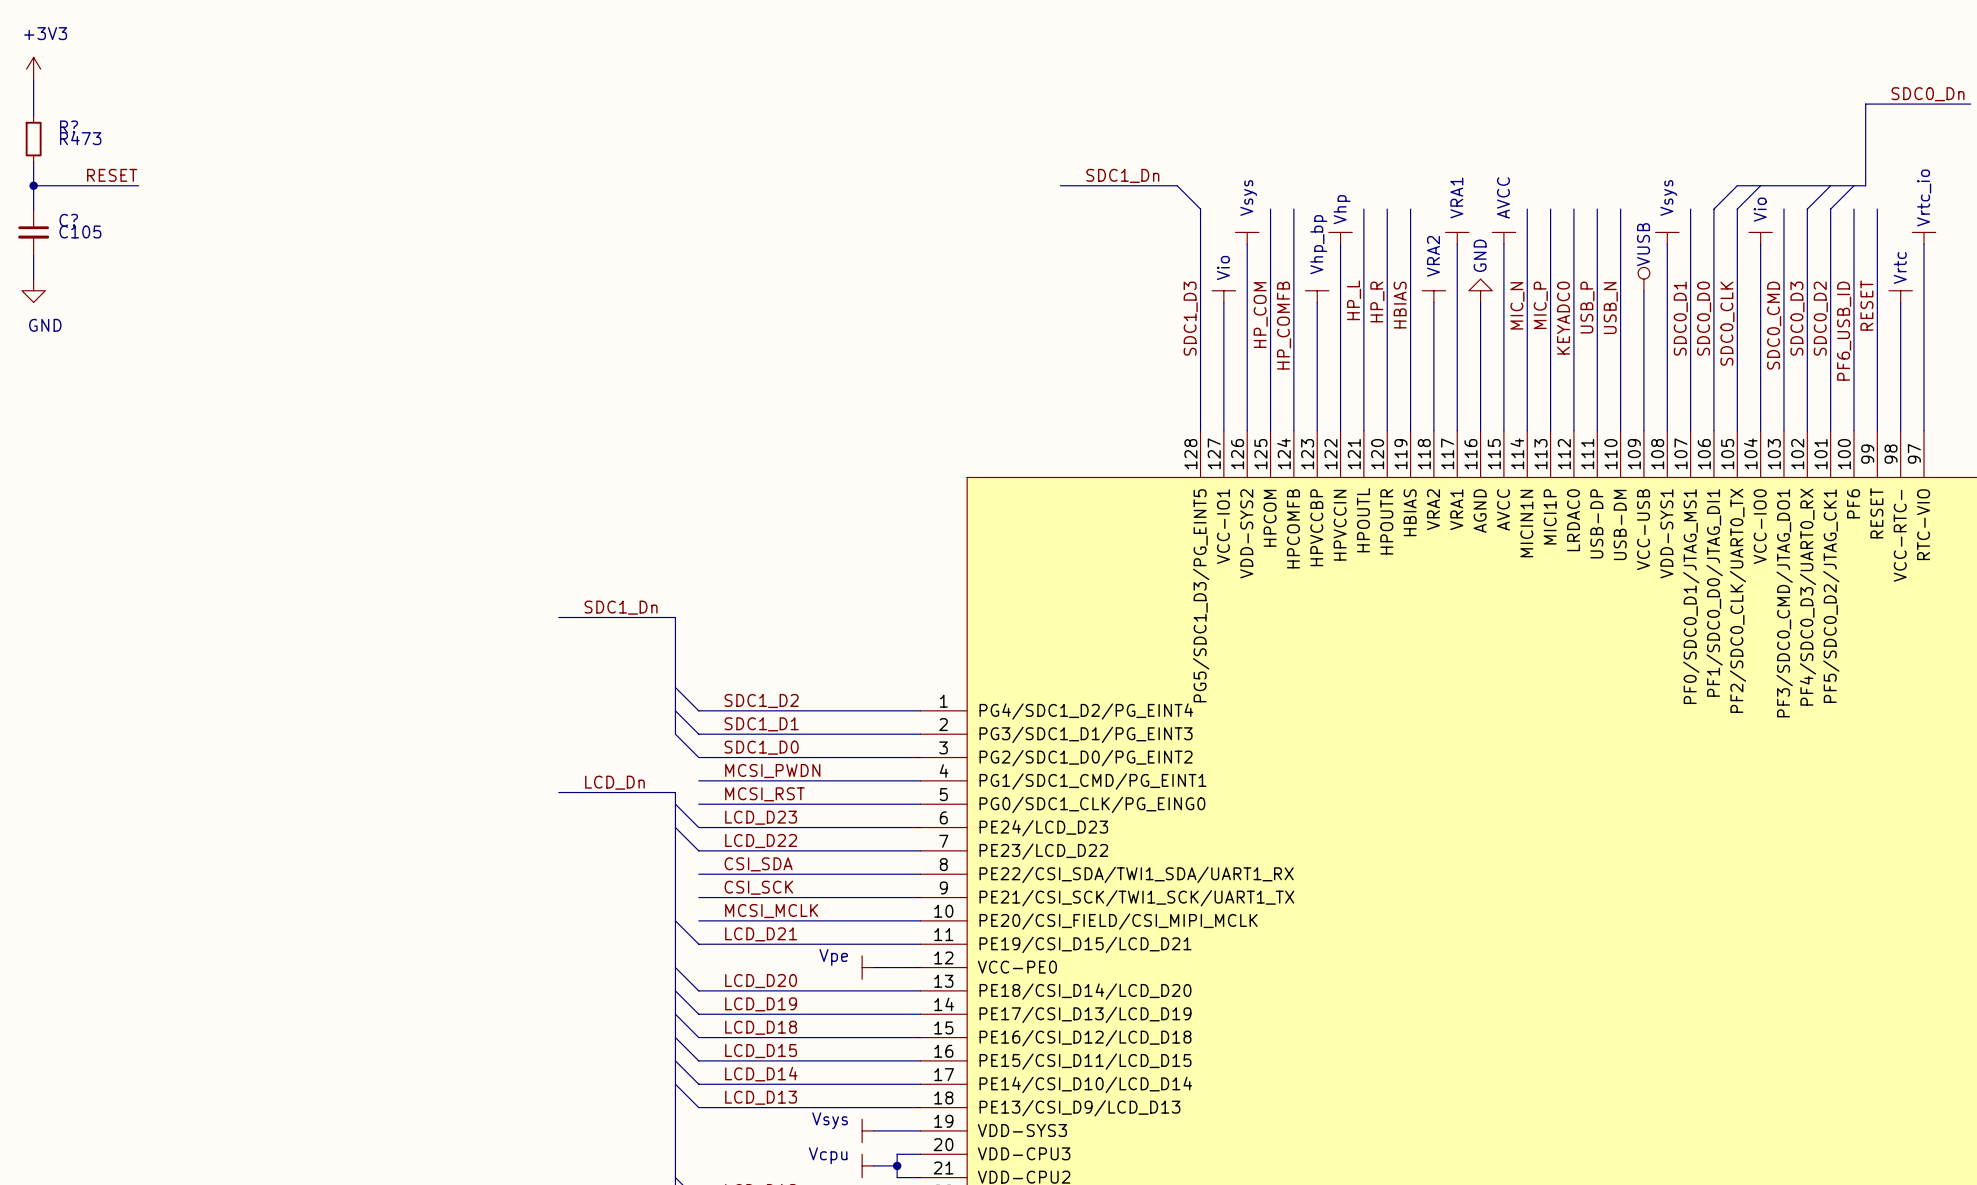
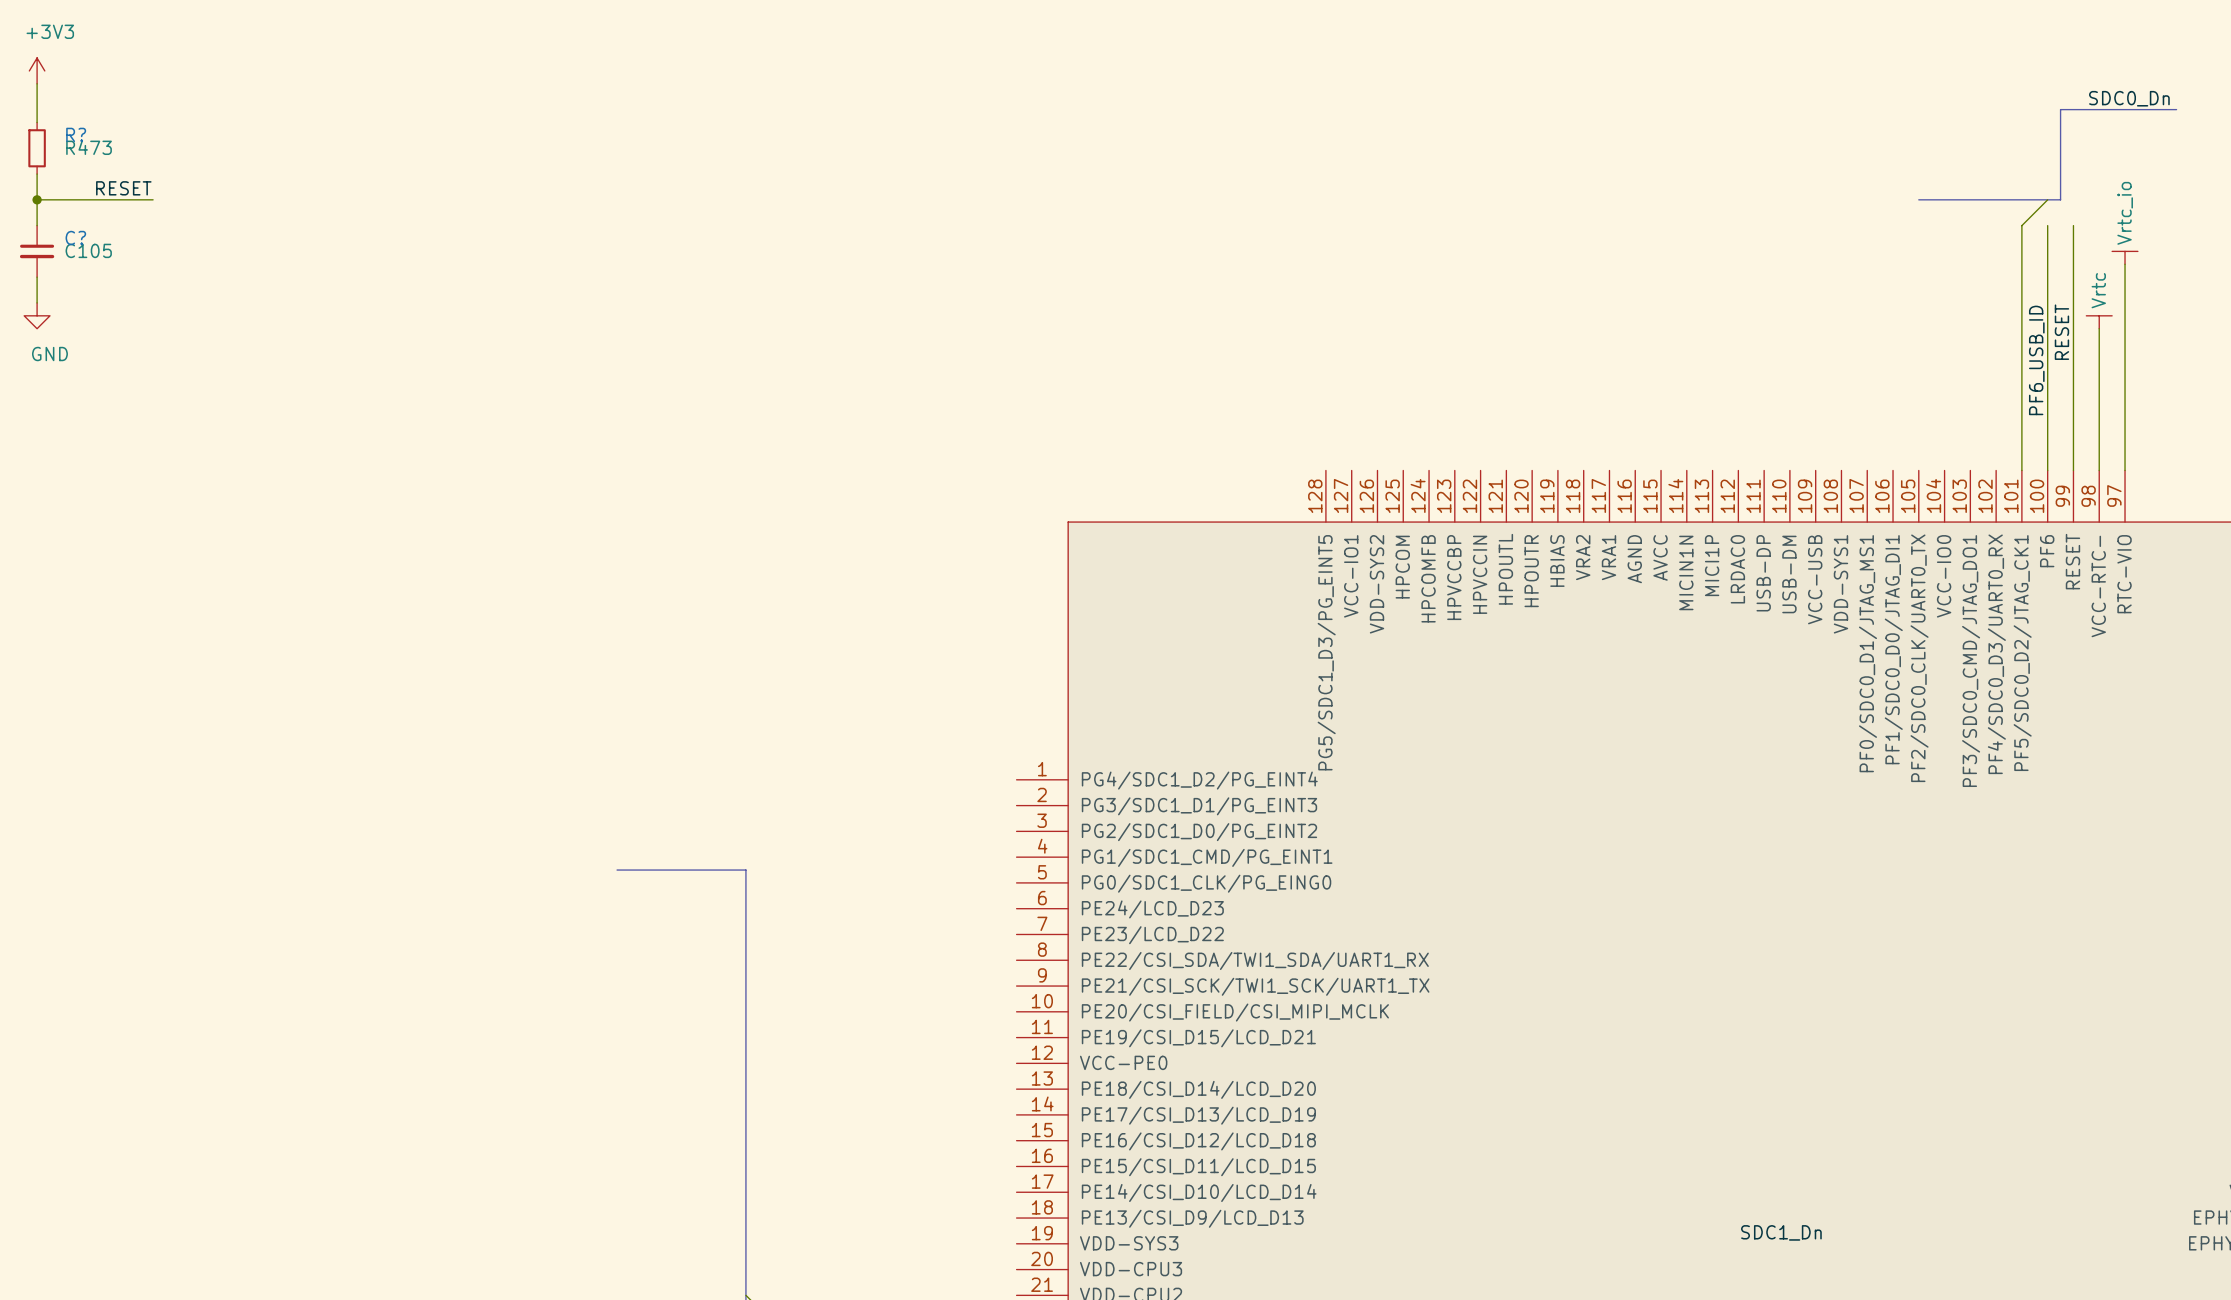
label: SDC1_Dn (1122, 175) -> none
bus: (1060, 185) (1177, 185) -> none
wire: (1177, 185) (1200, 209) (1200, 430) -> none
wire: (1737, 185) (1713, 209) (1713, 430) -> none
wire: (1760, 185) (1737, 209) (1737, 430) -> none
wire: (1830, 185) (1807, 209) (1807, 430) -> none
wire: (1270, 209) (1270, 430) -> none
wire: (1293, 209) (1293, 430) -> none
wire: (1363, 209) (1363, 430) -> none
wire: (1387, 209) (1387, 430) -> none
wire: (1410, 209) (1410, 430) -> none
wire: (1527, 209) (1527, 430) -> none
wire: (1550, 209) (1550, 430) -> none
wire: (1573, 209) (1573, 430) -> none
wire: (1597, 209) (1597, 430) -> none
wire: (1620, 209) (1620, 430) -> none
wire: (1690, 209) (1690, 430) -> none
wire: (1783, 209) (1783, 430) -> none
power symbol: Vsys (1247, 238) -> none
power symbol: Vhp (1340, 238) -> none
power symbol: VRA1 (1457, 238) -> none
power symbol: AVCC (1503, 238) -> none
power symbol: Vsys (1667, 238) -> none
power symbol: Vio (1760, 238) -> none
wire: (1247, 244) (1247, 430) -> none
wire: (1340, 244) (1340, 430) -> none
wire: (1457, 244) (1457, 430) -> none
wire: (1503, 244) (1503, 430) -> none
wire: (1667, 244) (1667, 430) -> none
wire: (1760, 244) (1760, 430) -> none
power symbol: VUSB (1643, 279) -> none
power symbol: GND (1480, 290) -> none
wire: (1643, 290) (1643, 430) -> none
power symbol: Vio (1223, 296) -> none
power symbol: Vhp_bp (1317, 296) -> none
power symbol: VRA2 (1433, 296) -> none
label: HP_L (1354, 300) -> none
label: HP_R (1377, 301) -> none
wire: (1223, 302) (1223, 430) -> none
wire: (1317, 302) (1317, 430) -> none
wire: (1433, 302) (1433, 430) -> none
wire: (1480, 302) (1480, 430) -> none
label: HBIAS (1400, 305) -> none
label: MIC_N (1517, 305) -> none
label: MIC_P (1540, 305) -> none
label: USB_P (1587, 307) -> none
label: USB_N (1610, 308) -> none
label: HP_COM (1260, 315) -> none
label: SDC1_D3 (1190, 318) -> none
label: KEYADC0 (1563, 318) -> none
label: SDC0_D1 (1680, 318) -> none
label: SDC0_D0 (1704, 318) -> none
label: SDC0_D3 (1797, 318) -> none
label: SDC0_D2 (1820, 318) -> none
label: SDC0_CLK (1727, 323) -> none
label: HP_COMFB (1284, 325) -> none
label: SDC0_CMD (1774, 325) -> none
label: SDC1_Dn (621, 607) -> none
bus: (558, 617) (675, 617) (675, 734) -> none
wire: (675, 687) (698, 710) (920, 710) -> none
label: SDC1_D2 (761, 700) -> none
wire: (675, 710) (698, 734) (920, 734) -> none
label: SDC1_D1 (761, 724) -> none
wire: (675, 734) (698, 757) (920, 757) -> none
label: SDC1_D0 (761, 747) -> none
label: MCSI_PWDN (772, 771) -> none
wire: (698, 780) (920, 780) -> none
label: LCD_Dn (614, 782) -> none
label: MCSI_RST (764, 794) -> none
wire: (675, 804) (698, 827) (920, 827) -> none
wire: (698, 804) (920, 804) -> none
label: LCD_D23 (761, 817) -> none
wire: (675, 827) (698, 850) (920, 850) -> none
label: LCD_D22 (761, 841) -> none
label: CSI_SDA (758, 864) -> none
wire: (698, 874) (920, 874) -> none
label: CSI_SCK (758, 887) -> none
wire: (698, 897) (920, 897) -> none
label: MCSI_MCLK (771, 911) -> none
wire: (675, 920) (698, 944) (920, 944) -> none
wire: (698, 920) (920, 920) -> none
label: LCD_D21 (761, 934) -> none
wire: (675, 967) (698, 990) (920, 990) -> none
power symbol: Vpe (867, 967) -> none
wire: (873, 967) (920, 967) -> none
label: LCD_D20 (761, 981) -> none
wire: (675, 990) (698, 1014) (920, 1014) -> none
label: LCD_D19 (761, 1004) -> none
wire: (675, 1014) (698, 1037) (920, 1037) -> none
label: LCD_D18 (761, 1027) -> none
wire: (675, 1037) (698, 1060) (920, 1060) -> none
label: LCD_D15 (761, 1051) -> none
wire: (675, 1060) (698, 1084) (920, 1084) -> none
label: LCD_D14 (761, 1074) -> none
wire: (675, 1084) (698, 1107) (920, 1107) -> none
label: LCD_D13 (761, 1097) -> none
label: none -> SDC1_Dn (1781, 1232)
power symbol: Vsys (867, 1130) -> none
wire: (873, 1130) (920, 1130) -> none
wire: (920, 1154) (897, 1154) (897, 1177) (920, 1177) -> none
power symbol: Vcpu (867, 1165) -> none
wire: (873, 1165) (897, 1165) -> none
junction: (897, 1165) -> none

